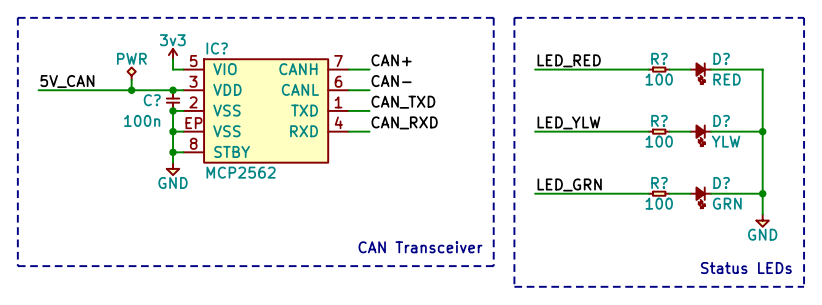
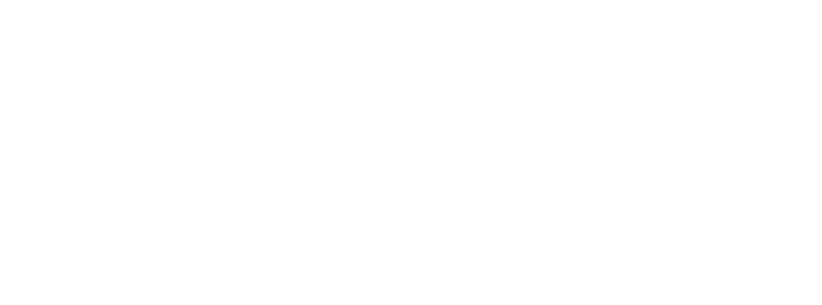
line: (17, 17) (493, 17) (493, 266) (17, 266) (17, 17) -> none
line: (514, 17) (804, 17) (804, 286) (514, 286) (514, 17) -> none
power symbol: 3v3 (173, 54) -> none
wire: (173, 59) (173, 69) (183, 69) -> none
label: CAN+ (391, 60) -> none
label: LED_RED (569, 60) -> none
wire: (348, 69) (369, 69) -> none
wire: (535, 69) (648, 69) -> none
R?: 100 (659, 69) -> none
wire: (669, 69) (690, 69) -> none
wire: (710, 69) (762, 69) (762, 214) -> none
power symbol: PWR (131, 73) -> none
D?: RED (700, 73) -> none
wire: (131, 79) (131, 90) -> none
label: 5V_CAN (67, 81) -> none
label: CAN- (391, 81) -> none
wire: (38, 90) (183, 90) -> none
junction: (131, 90) -> none
junction: (173, 90) -> none
wire: (348, 90) (369, 90) -> none
C?: 100n (173, 100) -> none
label: CAN_TXD (403, 102) -> none
junction: (173, 110) -> none
wire: (183, 110) (173, 110) (173, 162) -> none
IC?: MCP2562 (266, 110) -> none
wire: (348, 110) (369, 110) -> none
label: CAN_RXD (404, 122) -> none
label: LED_YLW (568, 122) -> none
wire: (173, 131) (183, 131) -> none
junction: (173, 131) -> none
wire: (348, 131) (369, 131) -> none
wire: (535, 131) (648, 131) -> none
R?: 100 (659, 131) -> none
wire: (669, 131) (690, 131) -> none
wire: (710, 131) (762, 131) -> none
junction: (762, 131) -> none
D?: YLW (700, 135) -> none
wire: (173, 152) (183, 152) -> none
junction: (173, 152) -> none
power symbol: GND (173, 168) -> none
label: LED_GRN (569, 184) -> none
wire: (535, 193) (648, 193) -> none
R?: 100 (659, 193) -> none
wire: (669, 193) (690, 193) -> none
wire: (710, 193) (762, 193) -> none
junction: (762, 193) -> none
D?: GRN (700, 197) -> none
power symbol: GND (762, 220) -> none
text: CAN Transceiver (420, 247) -> none
text: Status LEDs (746, 267) -> none

